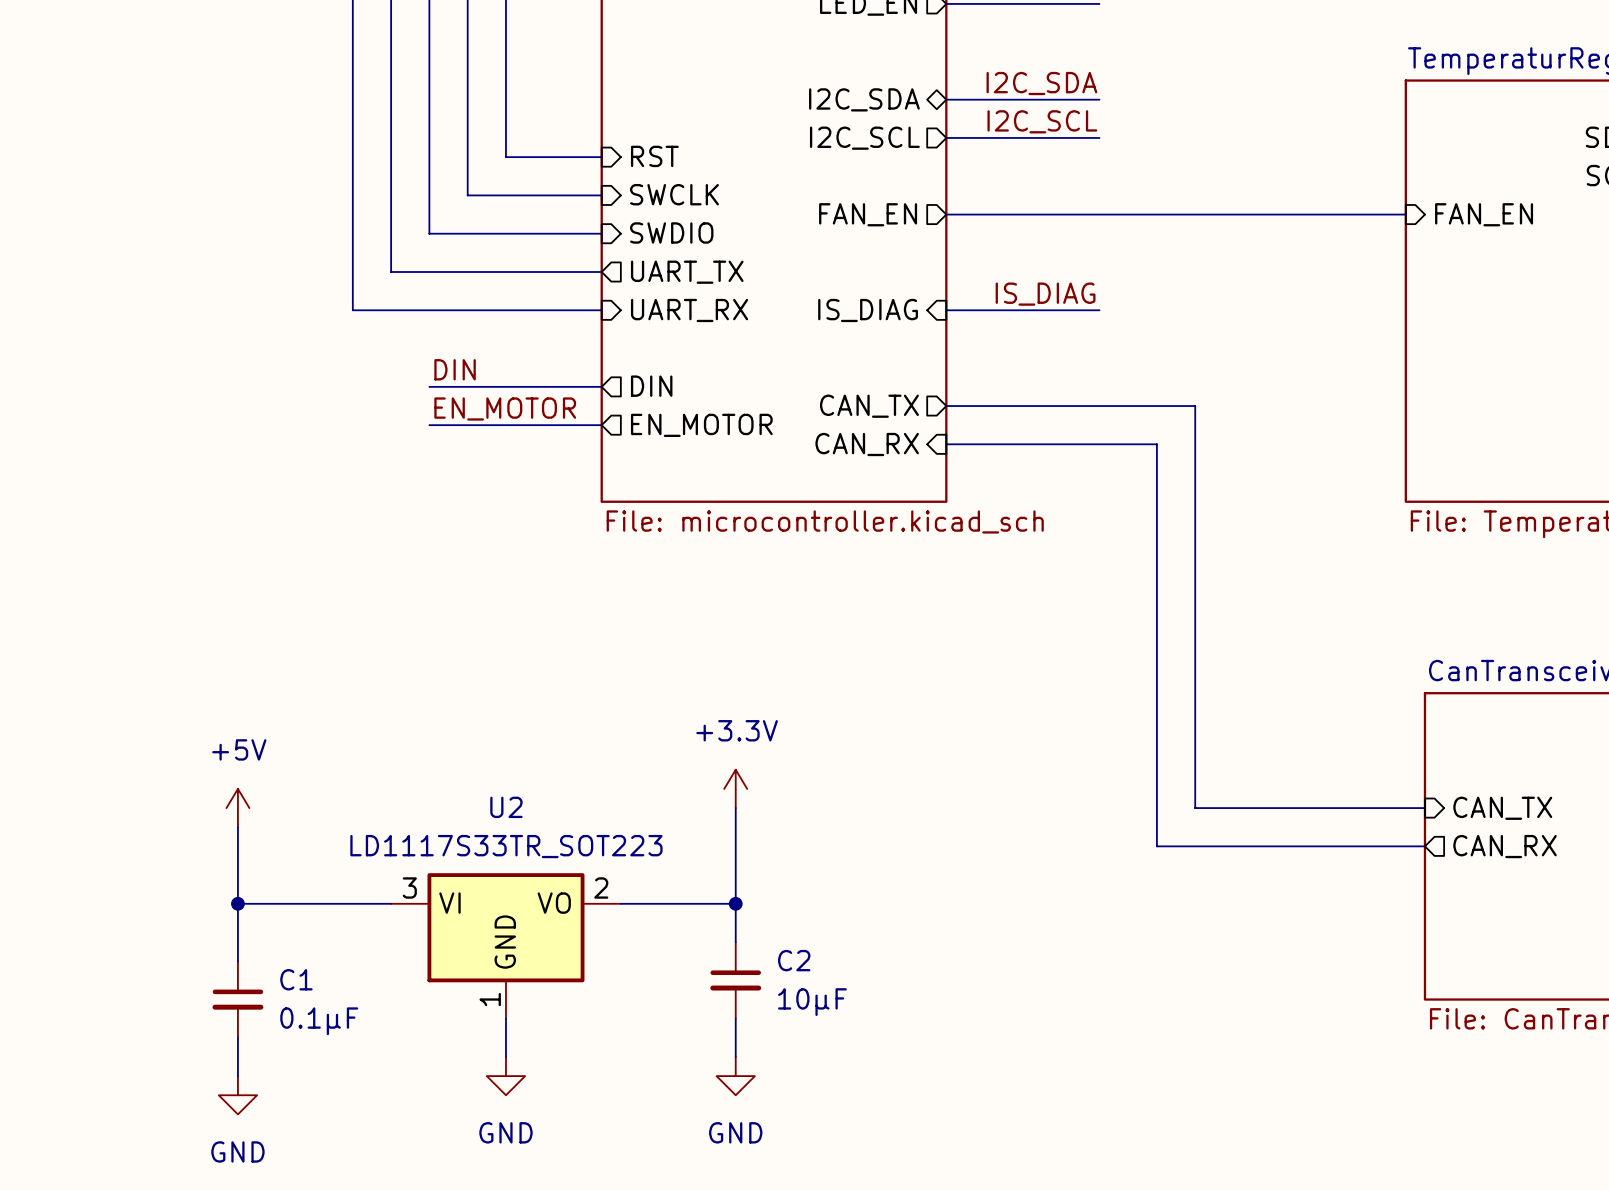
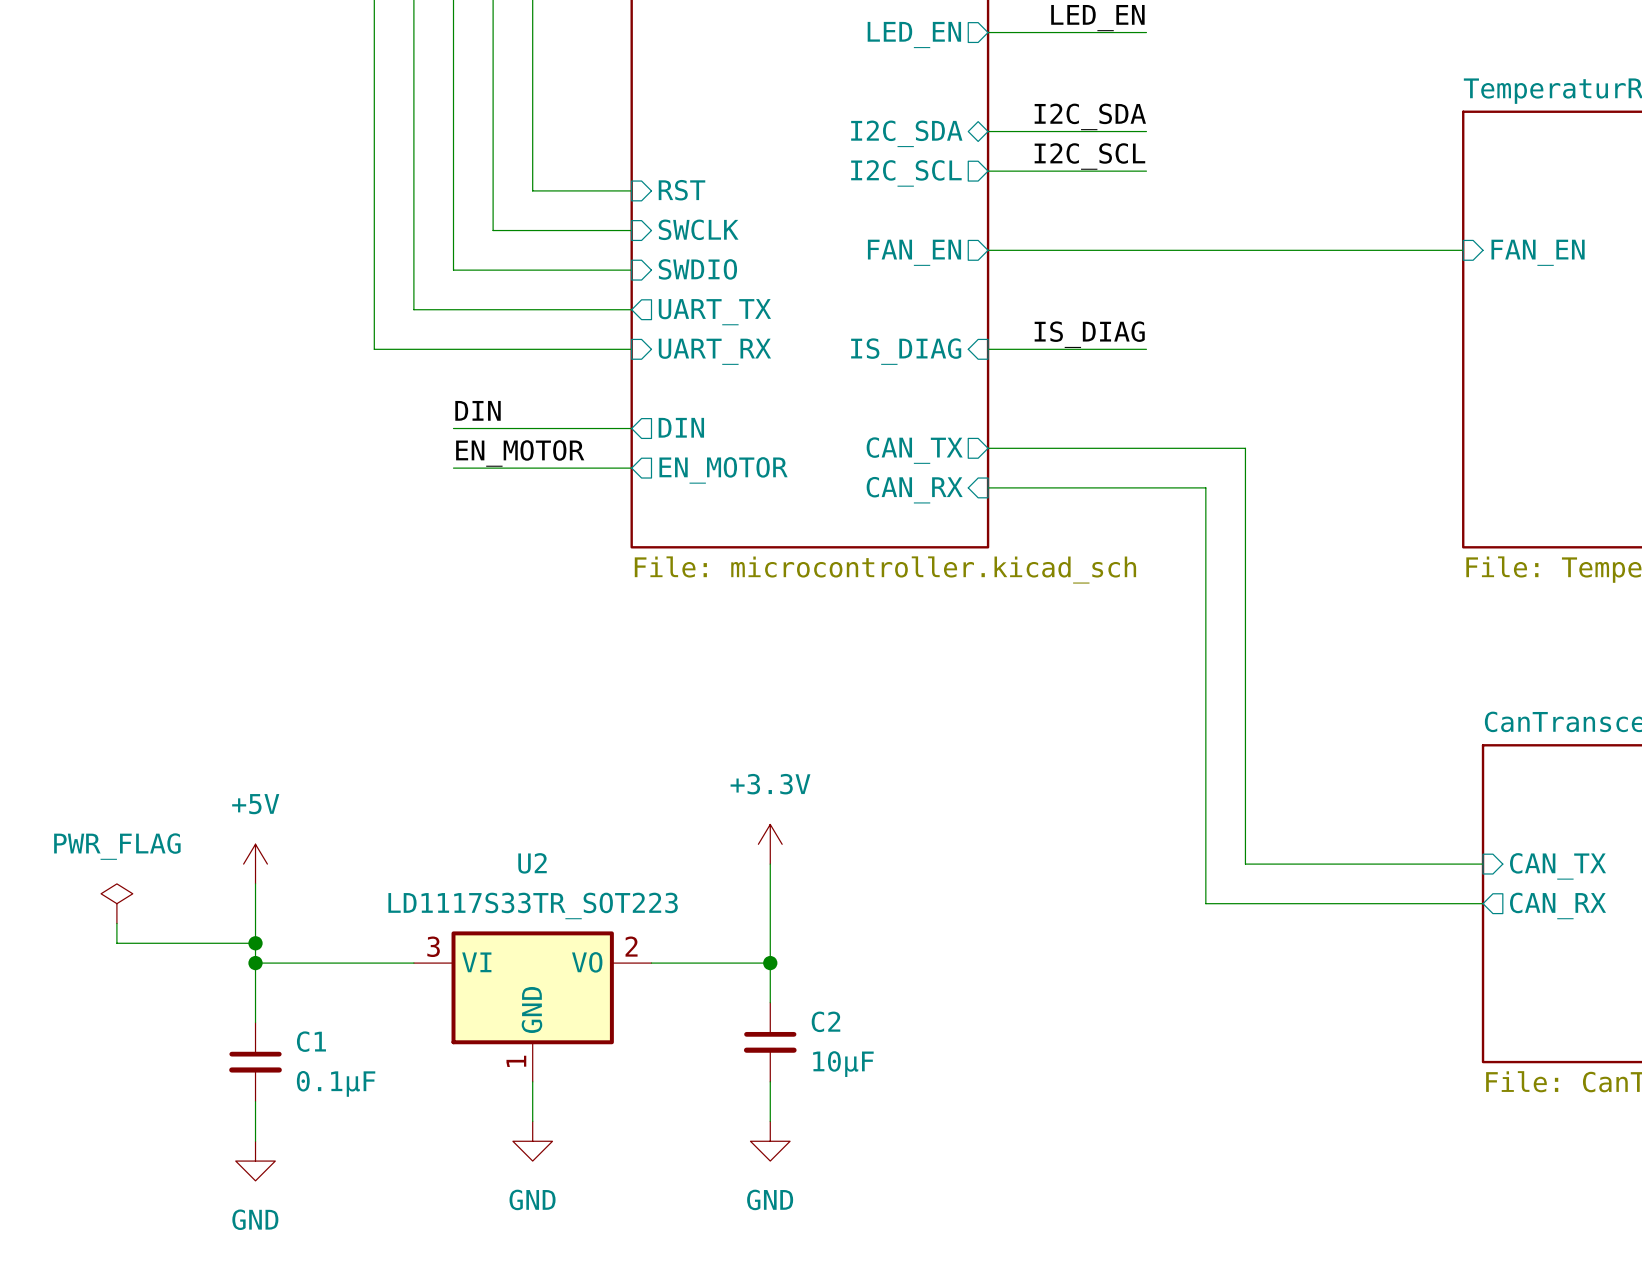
power symbol: none -> PWR_FLAG (116, 903)
wire: none -> (116, 923) (116, 943) (255, 943)
junction: none -> (255, 943)

